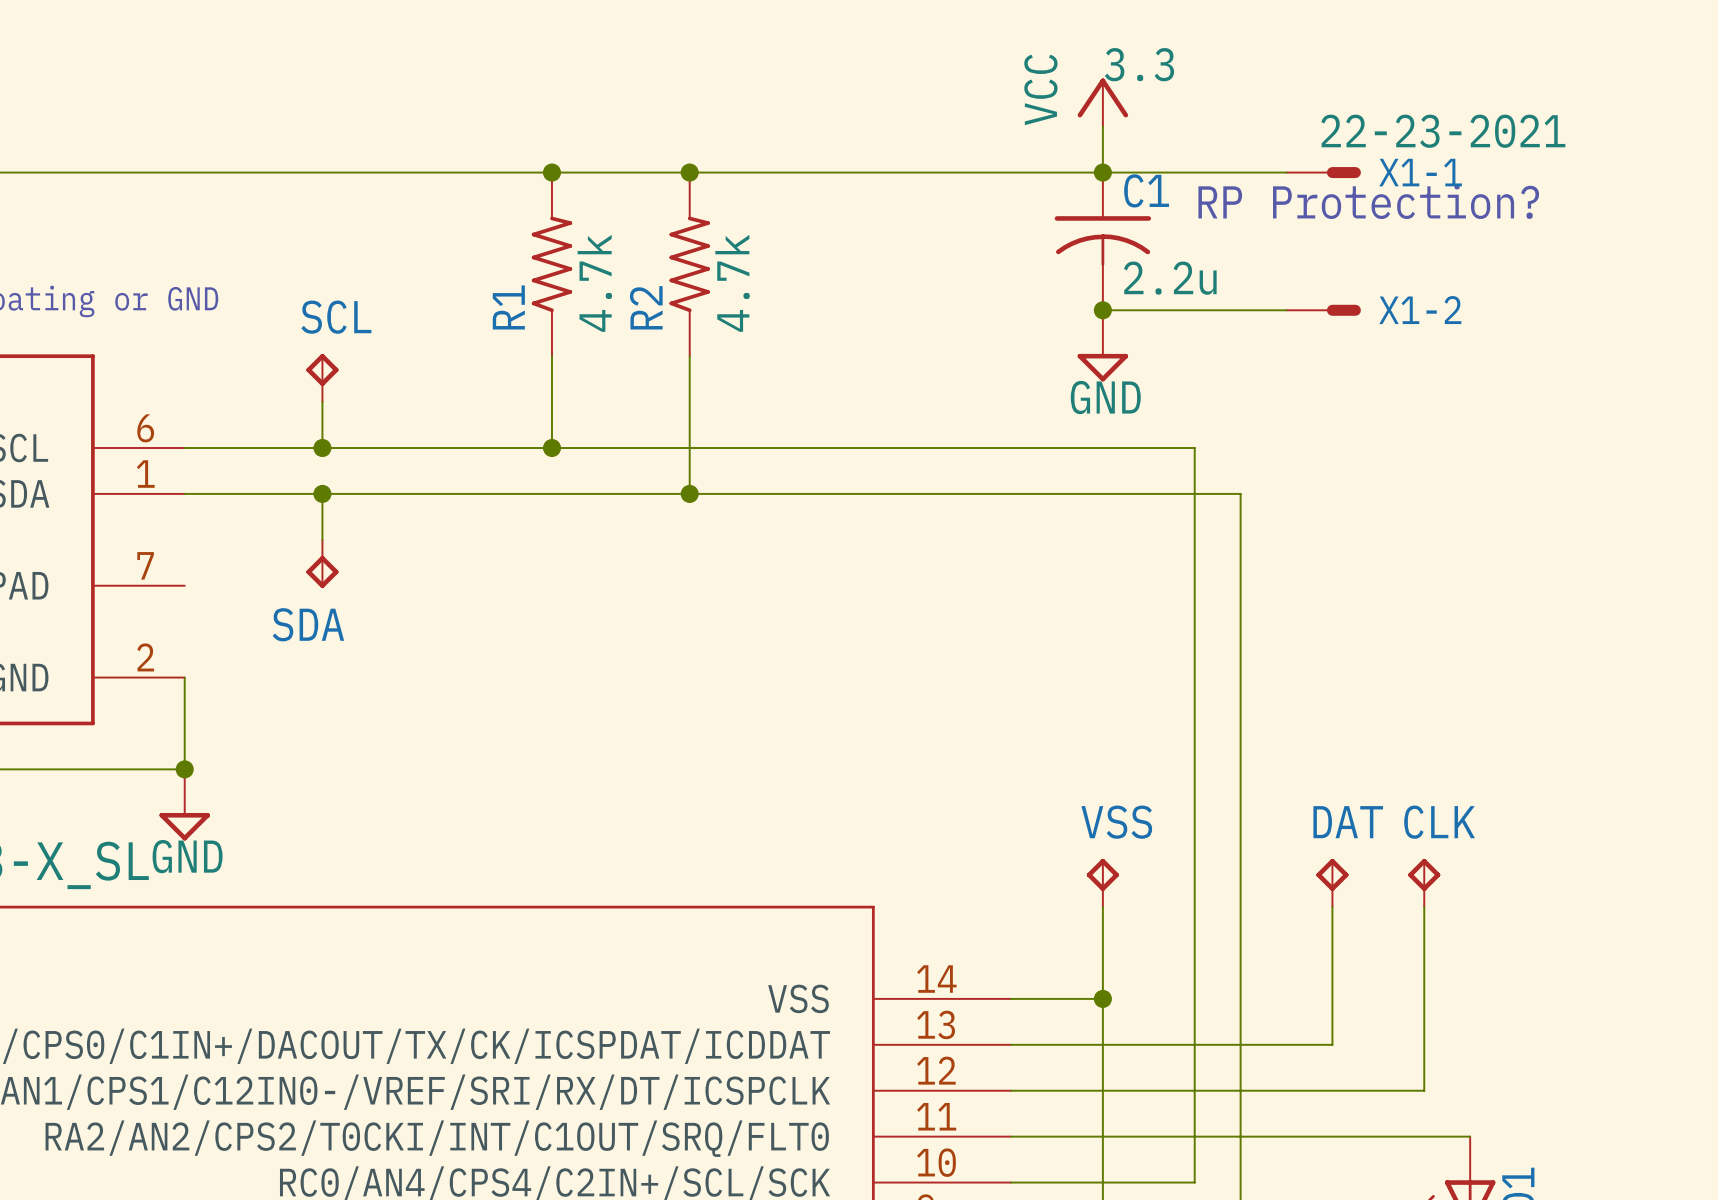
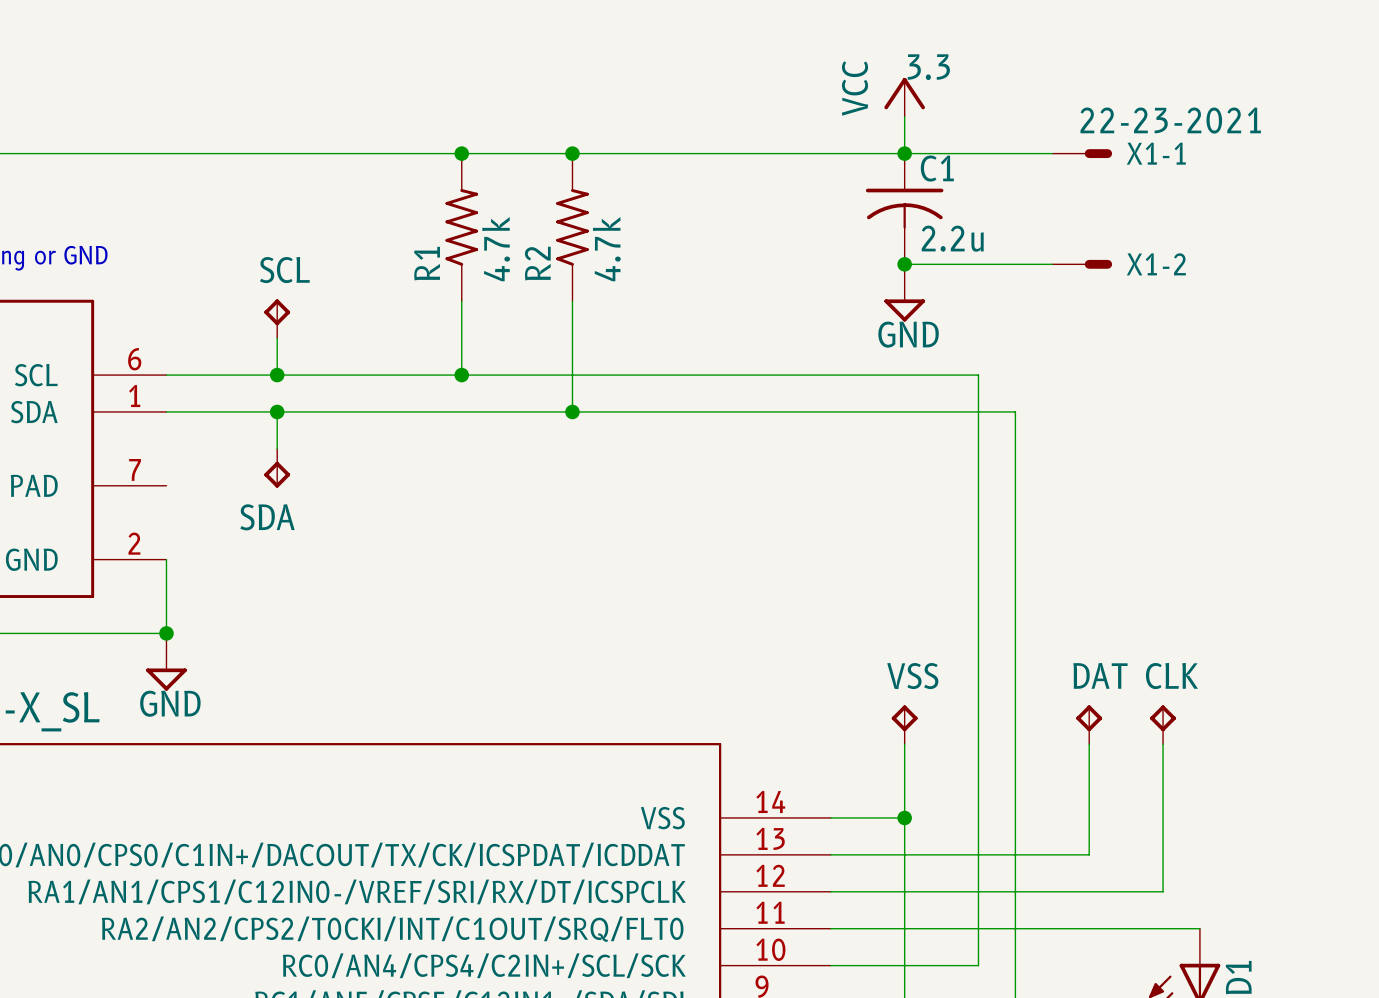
text: RP Protection? (1368, 201) -> none

